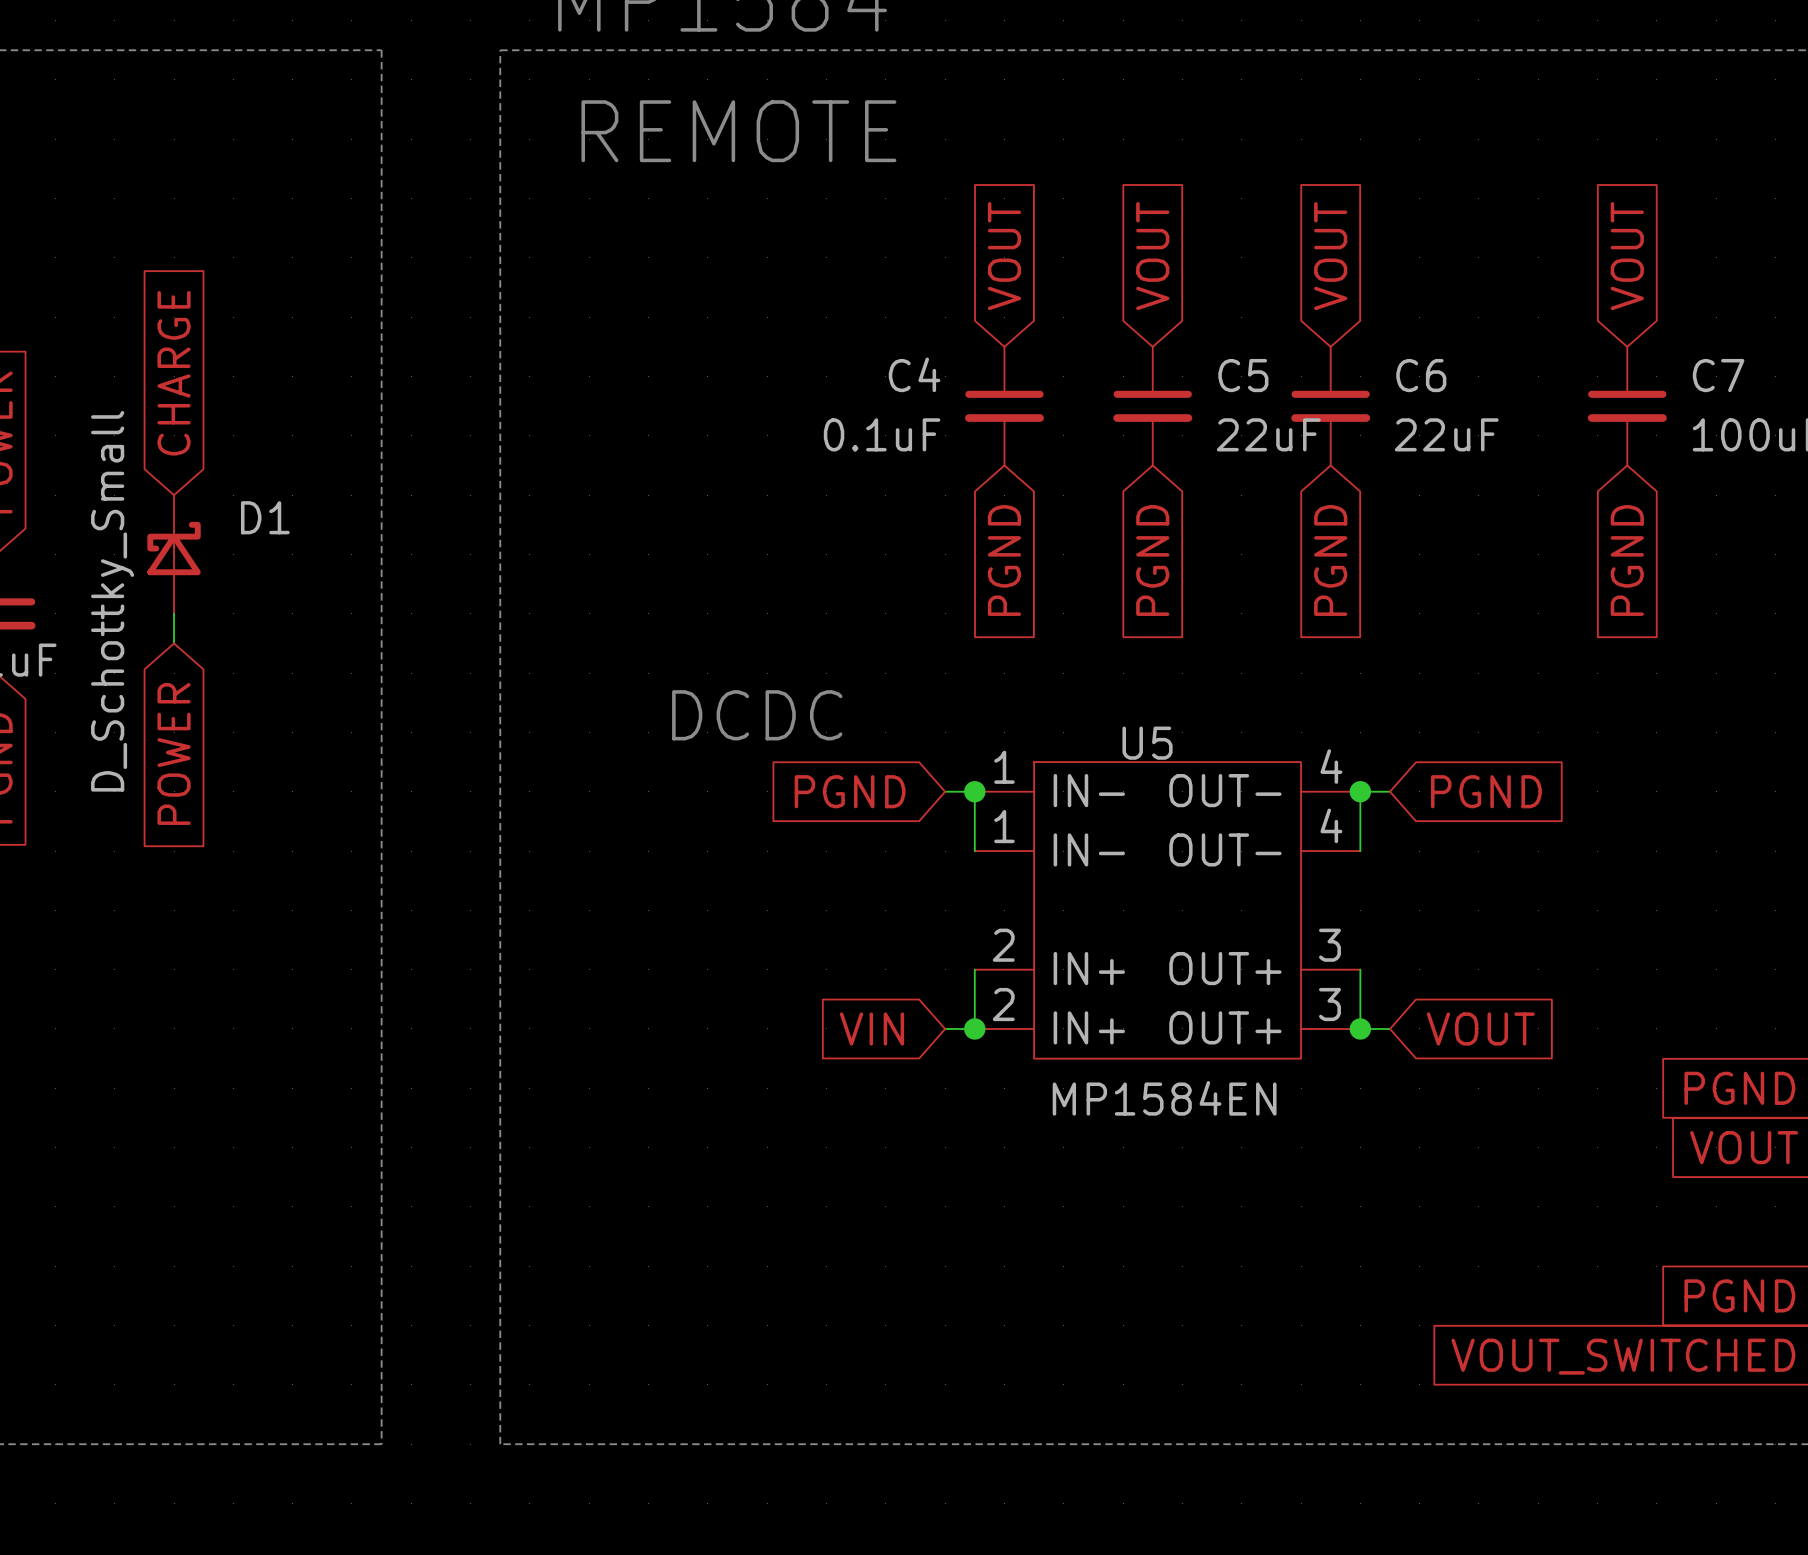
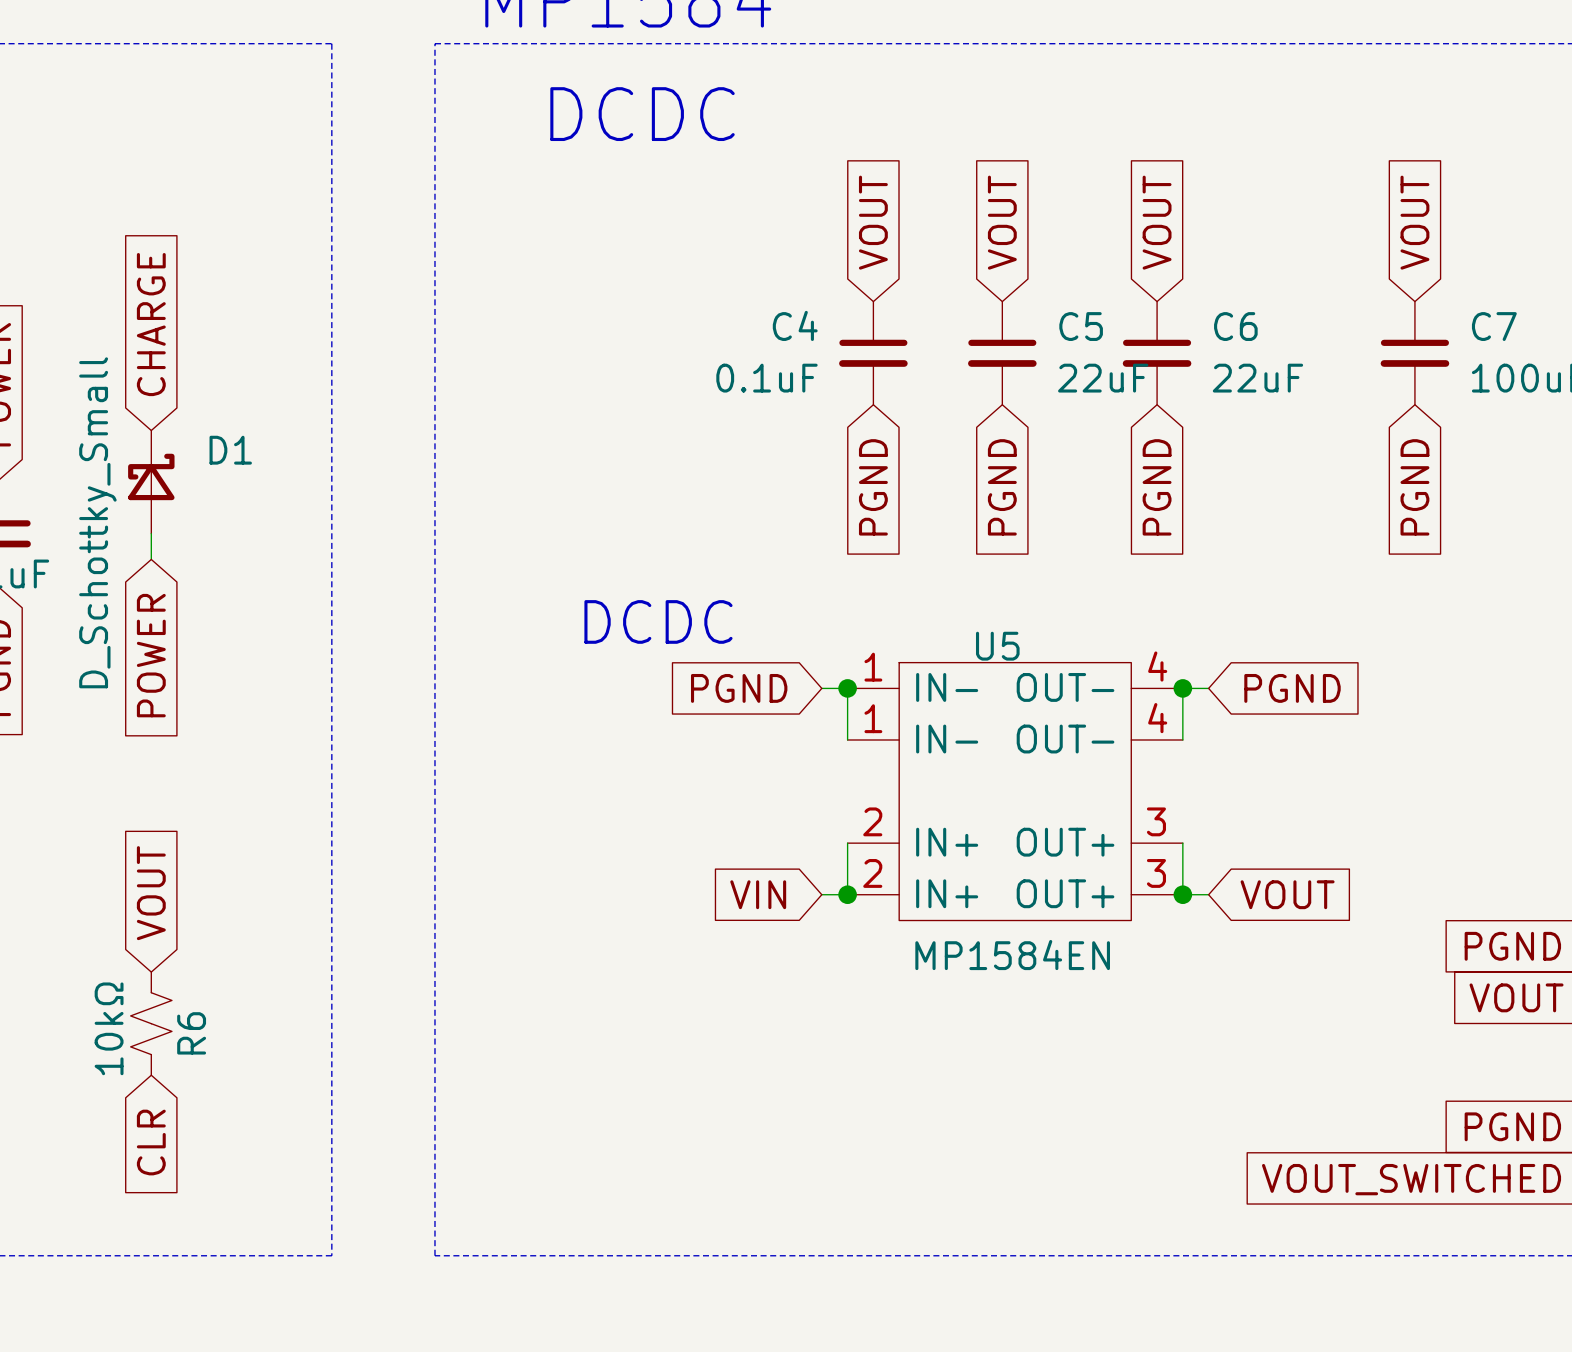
text: REMOTE (738, 131) -> DCDC (642, 114)
global label: none -> VOUT (151, 893)
R6: none -> 10kΩ (151, 1023)
global label: none -> CLR (151, 1142)

